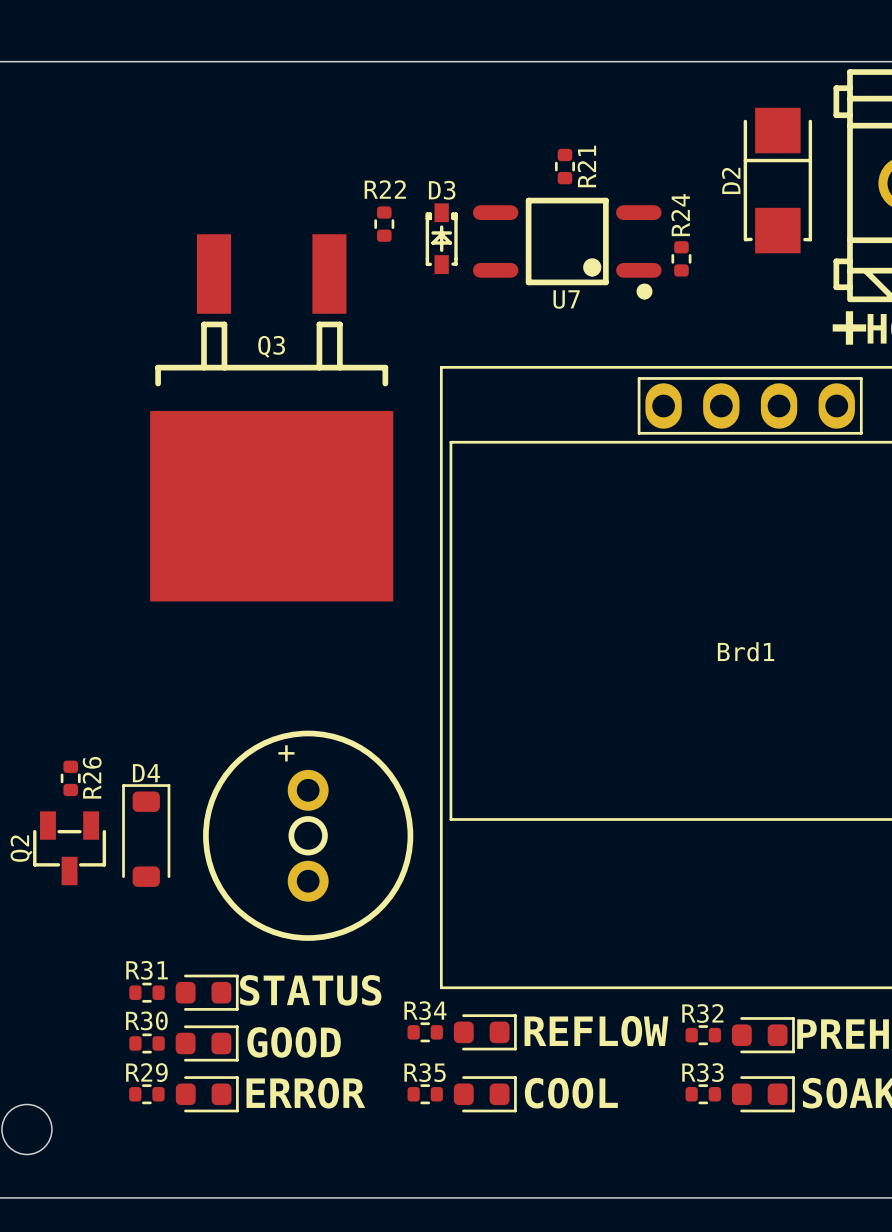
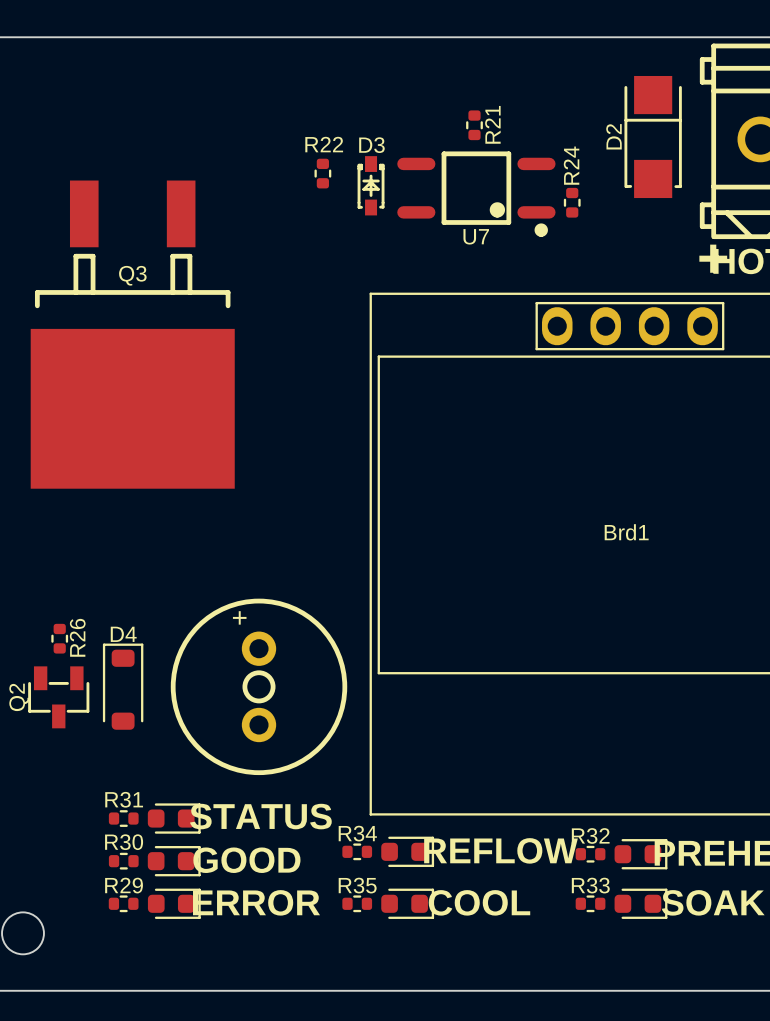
Q3 position: (271, 417) -> (132, 334)

